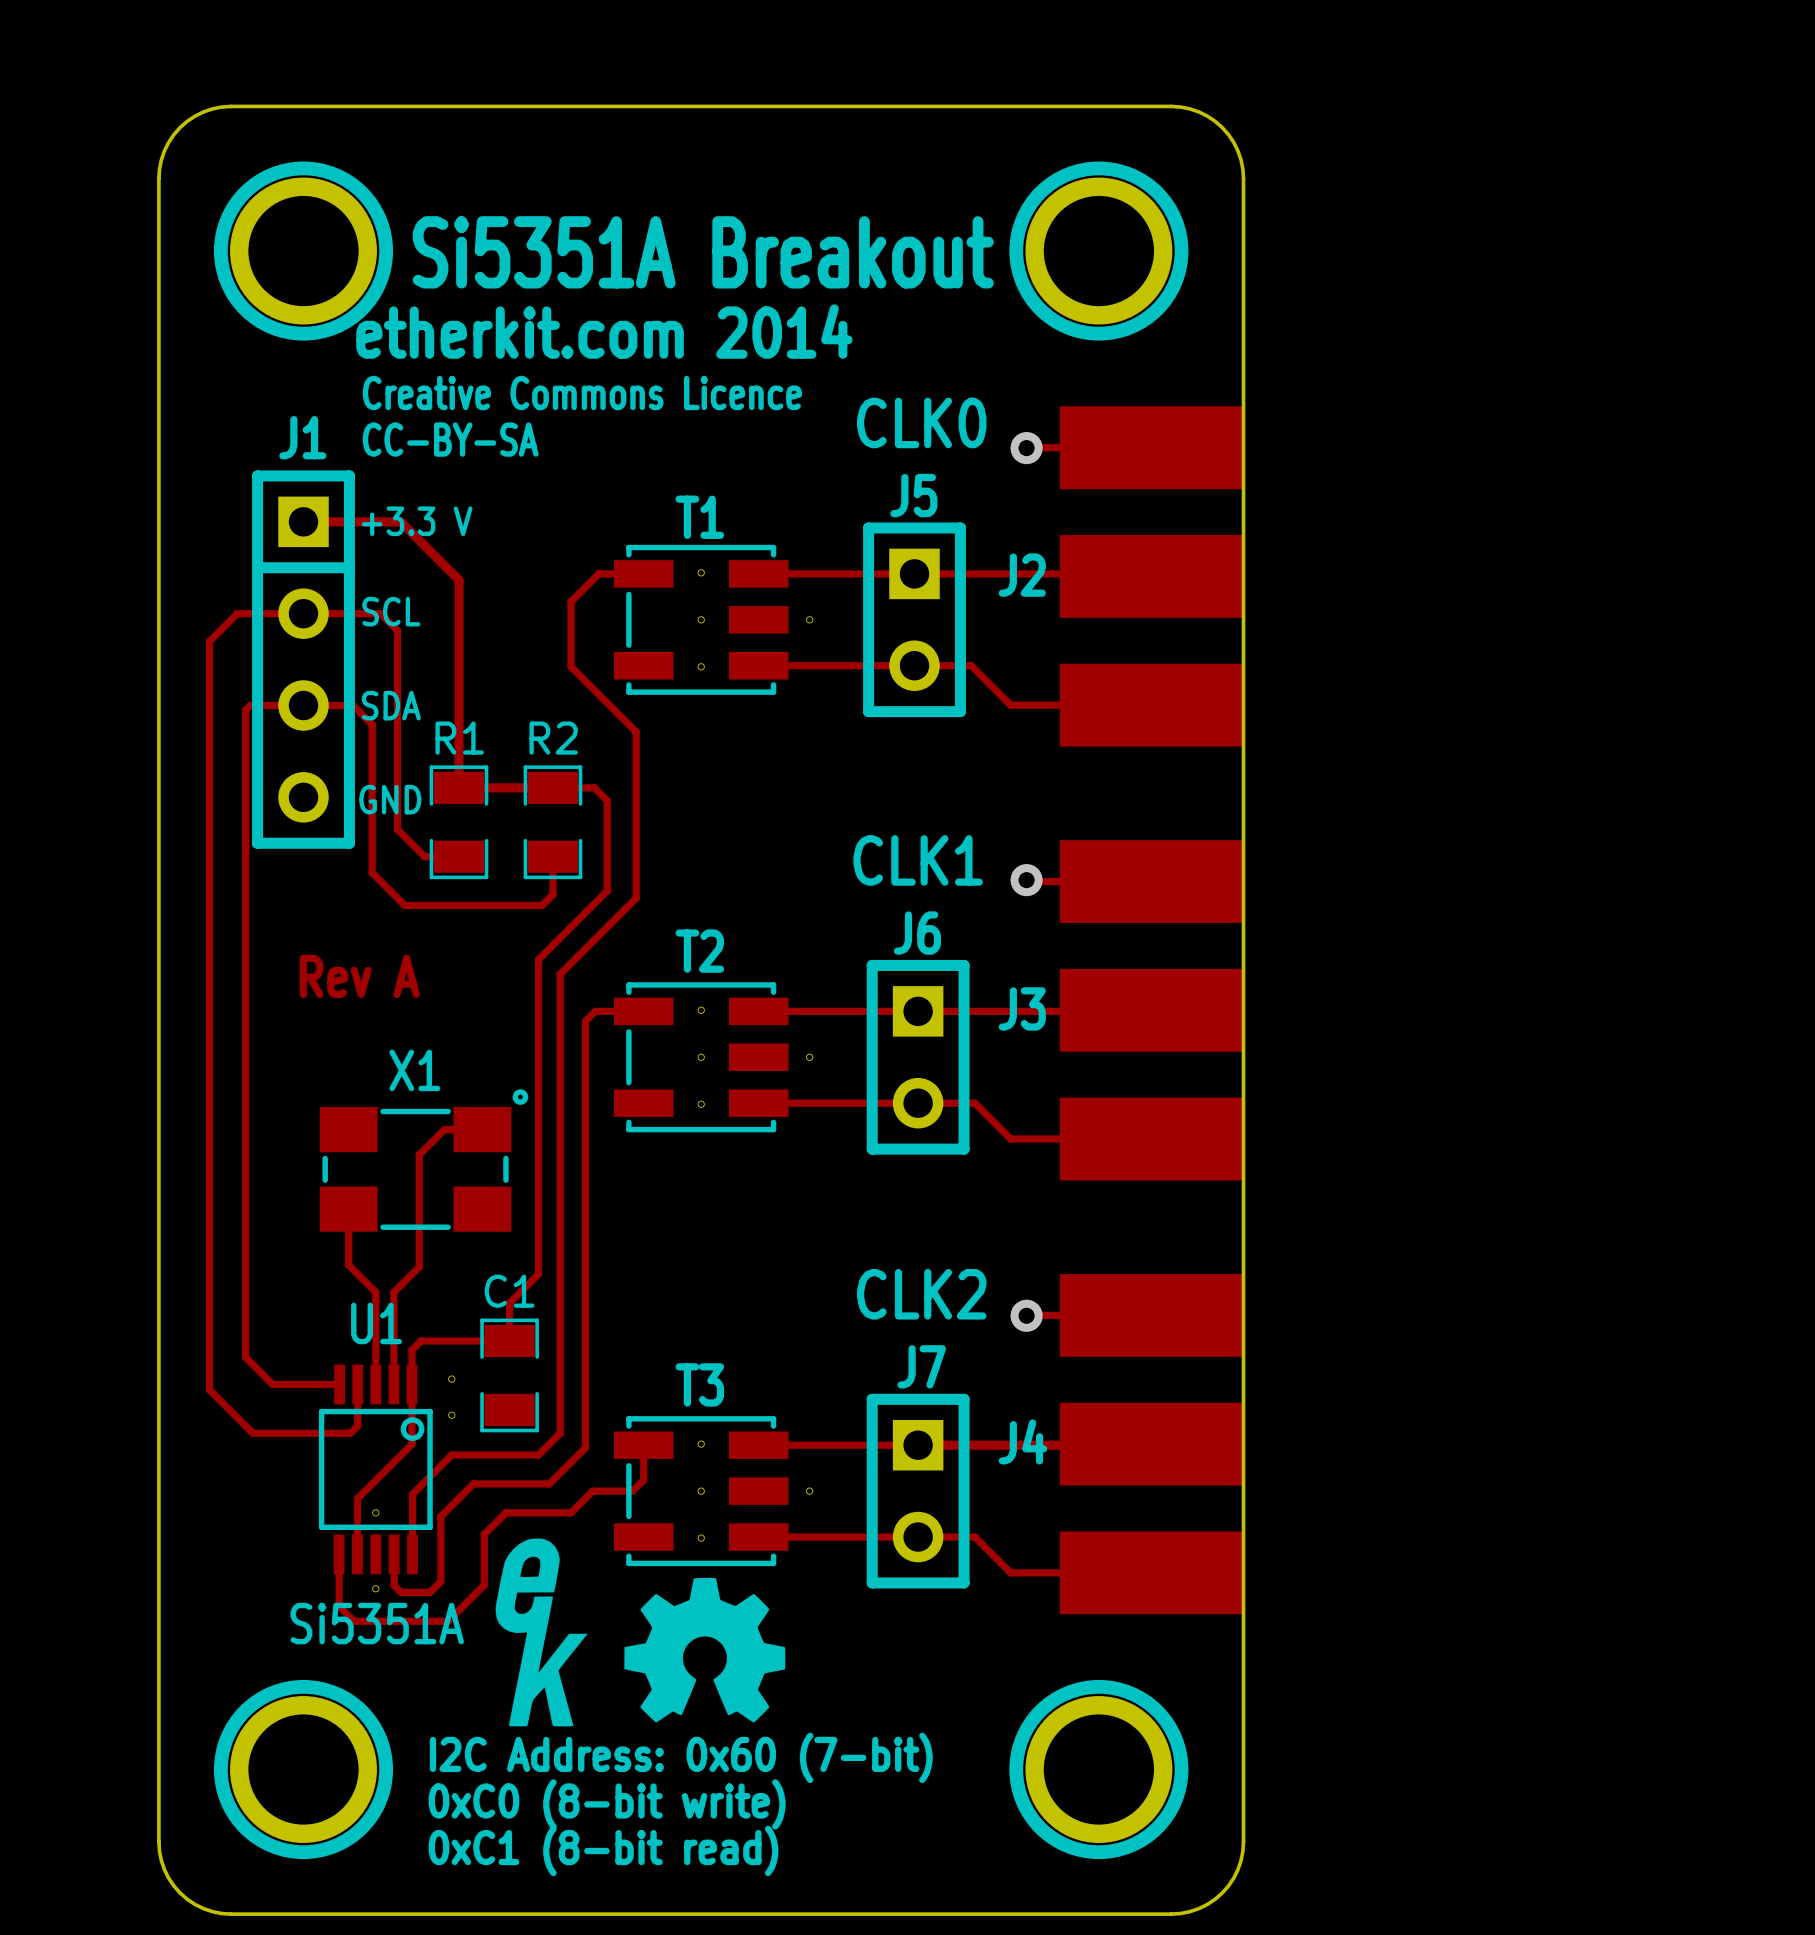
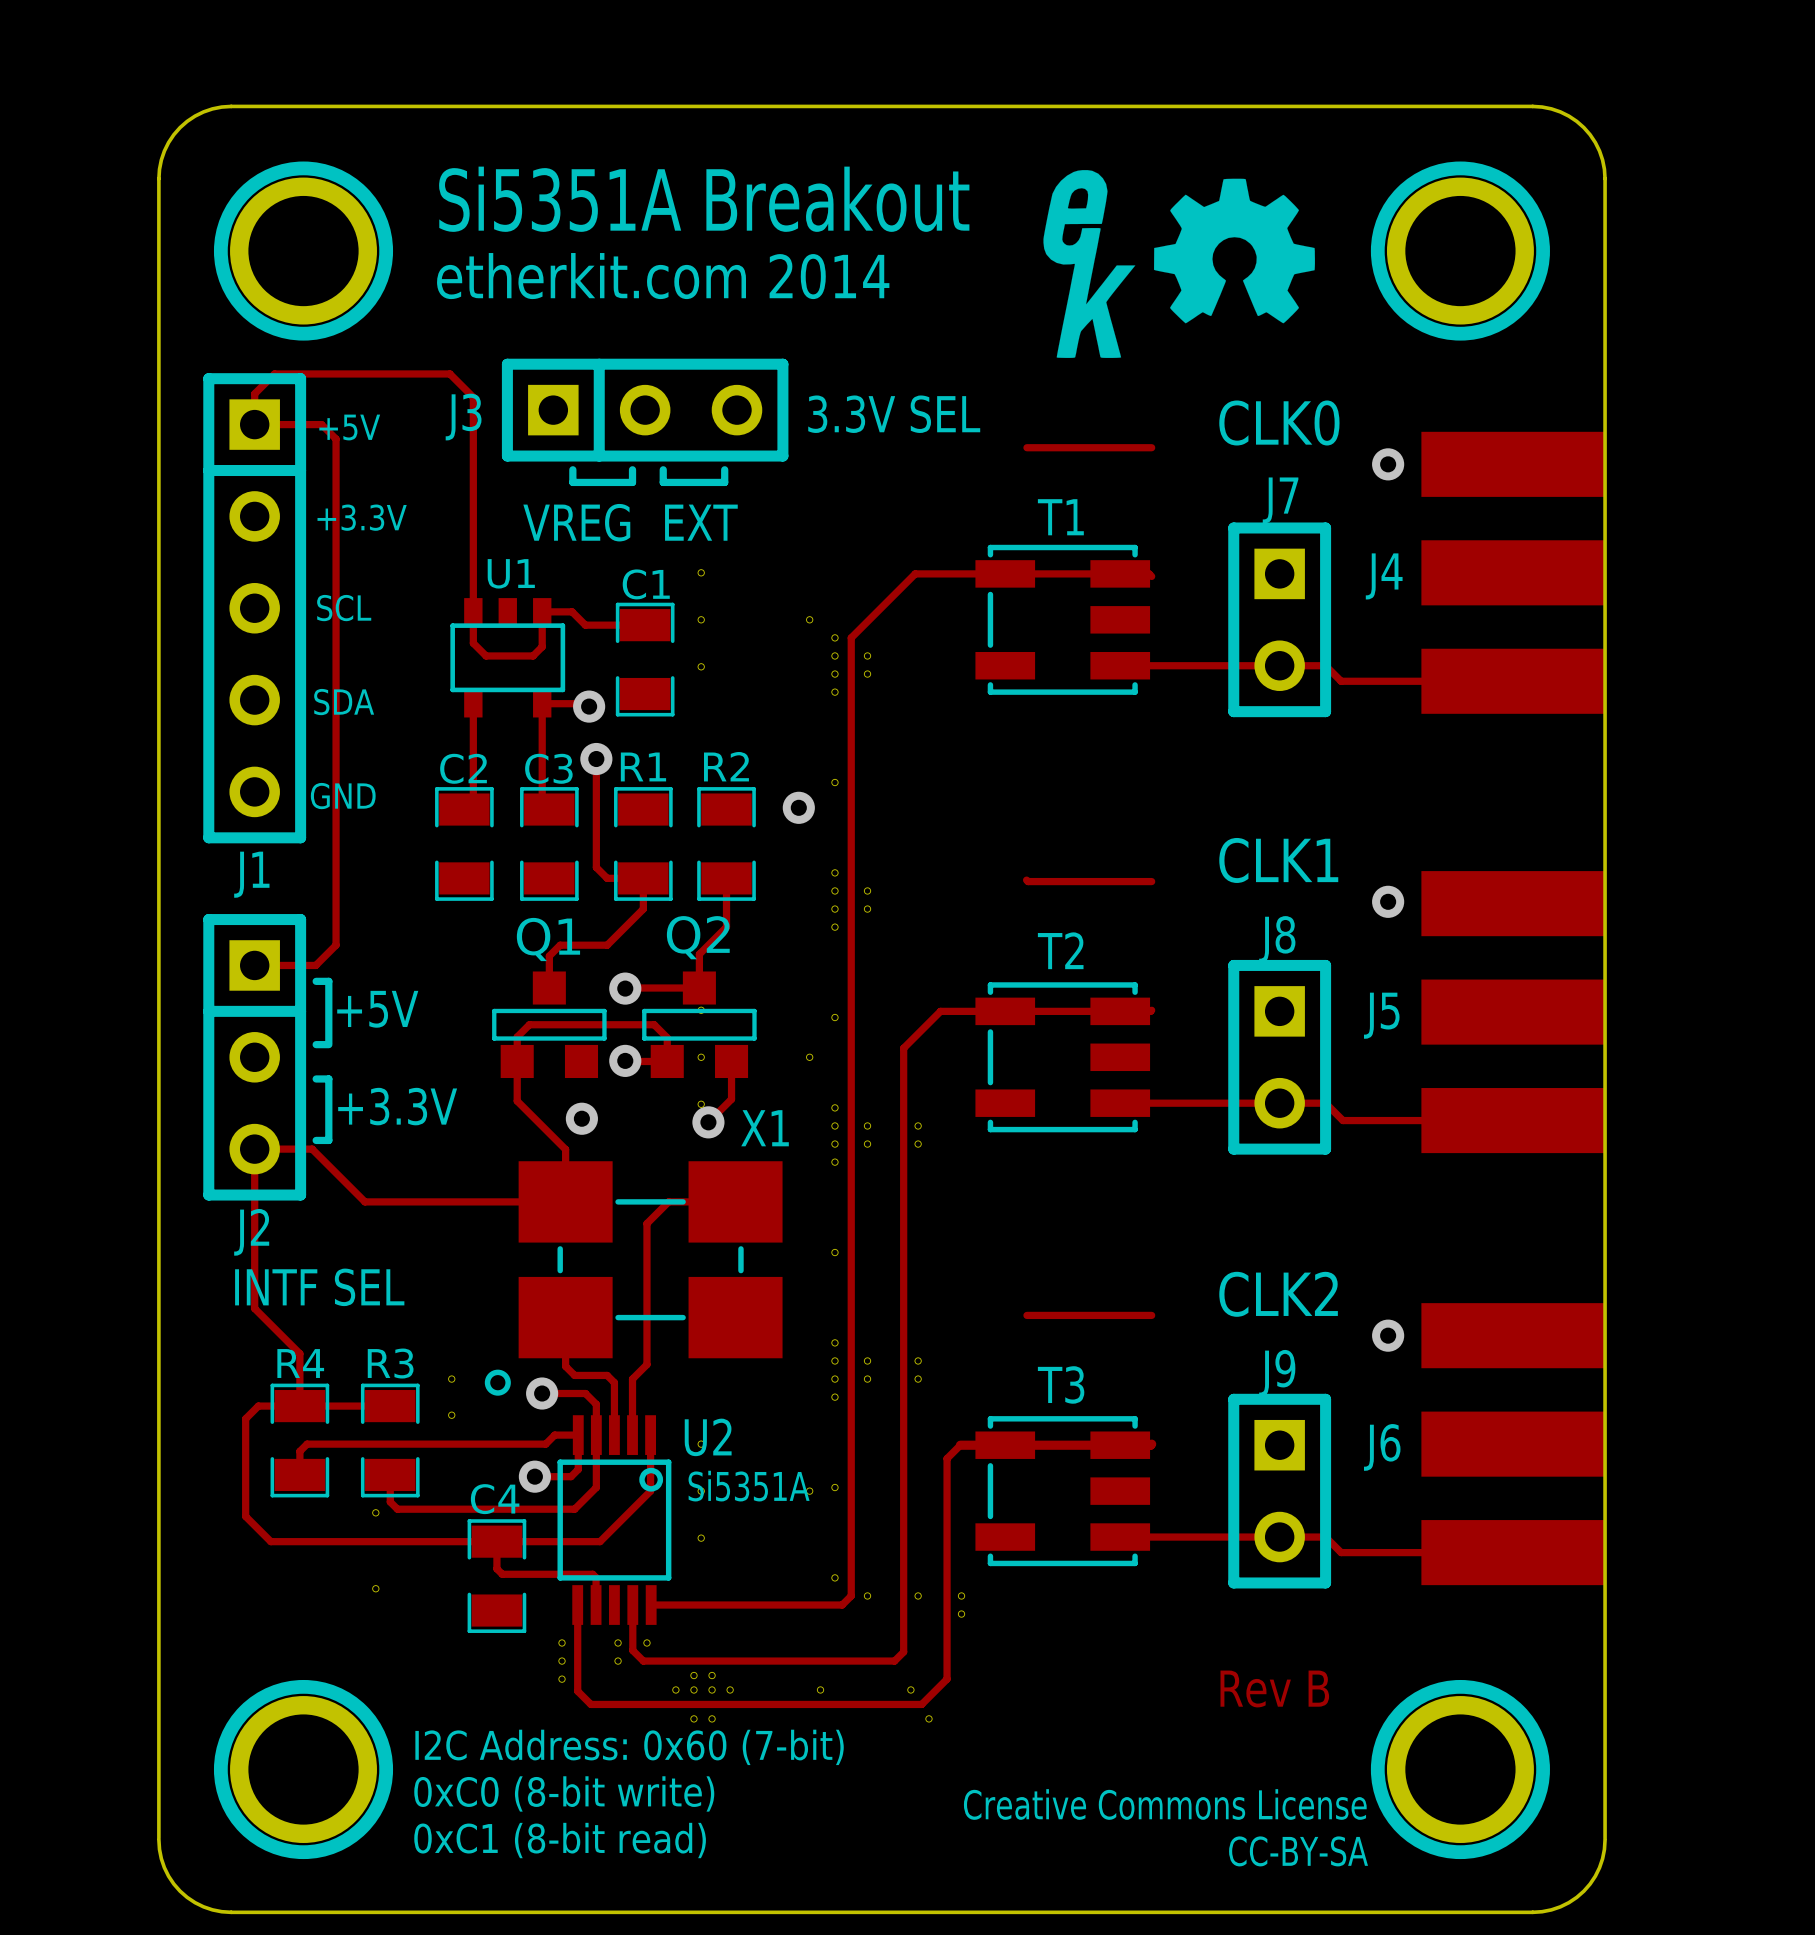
board edge: (1171, 106) (1198, 111) (1222, 127) (1238, 151) (1243, 178) (1243, 1841) (1241, 1860) (1233, 1877) (1222, 1892) (1207, 1904) (1189, 1911) (1171, 1914) (231, 1914) (203, 1908) (180, 1892) (164, 1869) (159, 1851) (158, 1838) -> (1171, 106) (1542, 107) (1560, 111) (1576, 121) (1590, 134) (1602, 160) (1605, 178) (1605, 1838)
drawing: none -> [1043, 170, 1315, 358]
part position: (1098, 251) -> (1460, 251)
text position: Si5351A Breakout (703, 252) -> Si5351A Breakout (704, 199)
text position: etherkit.com 2014 (604, 331) -> etherkit.com 2014 (663, 276)
text: Creative Commons Licence (582, 392) -> none
J2 footprint: [1059, 406, 1244, 747] -> [203, 914, 307, 1201]
text: none -> 3.3V SEL (894, 414)
text position: CLK0 (921, 422) -> CLK0 (1279, 422)
text: none -> +5V (349, 427)
J1 name position: J1 (302, 437) -> J1 (251, 874)
text: CC-BY-SA (450, 439) -> none
via: (1026, 448) -> none
via: none -> (1388, 464)
line: none -> (572, 469) (572, 482) (632, 482) (632, 469)
line: none -> (663, 469) (663, 482) (724, 482) (724, 469)
J1 footprint: [252, 470, 355, 849] -> [203, 373, 307, 844]
J5 name position: J5 (913, 495) -> J5 (1381, 1015)
track: (303, 521) (400, 521) (458, 580) (458, 787) (594, 787) (607, 800) (607, 890) (538, 959) (538, 1274) (509, 1303) (509, 1341) (421, 1341) (411, 1350) (411, 1444) (357, 1498) (357, 1554) -> none
text: +3.3 V (417, 521) -> +3.3V (362, 517)
text: none -> VREG (576, 522)
text: none -> EXT (701, 522)
J5 footprint: [863, 522, 966, 718] -> [1421, 871, 1606, 1154]
track: (643, 573) (598, 573) (571, 601) (571, 666) (636, 731) (636, 898) (560, 974) (560, 1433) (538, 1454) (451, 1454) (412, 1494) (412, 1554) -> none
track: (758, 573) (915, 573) -> (651, 1605) (842, 1605) (851, 1595) (851, 637) (915, 573)
J2 name position: J2 (1022, 575) -> J2 (251, 1232)
text position: SCL (391, 611) -> SCL (344, 608)
T1 position: (701, 619) -> (1062, 619)
track: none -> (645, 625) (585, 625) (572, 611) (542, 611) (542, 646) (533, 655) (486, 655) (473, 643) (473, 397) (449, 373) (274, 373) (254, 393) (254, 424) (321, 424) (336, 439) (336, 945) (315, 965) (254, 965)
part: none -> (834, 637)
part: none -> (834, 655)
part: none -> (867, 655)
track: (758, 665) (971, 665) (1010, 705) (1151, 705) -> none
track: none -> (1120, 665) (1325, 665) (1341, 681) (1513, 681)
part: none -> (834, 674)
part: none -> (867, 674)
part: none -> (834, 692)
track: none -> (473, 703) (473, 800) (464, 809)
text position: SDA (391, 705) -> SDA (344, 702)
track: none -> (589, 706) (586, 703) (542, 703) (542, 802) (549, 809)
via: none -> (589, 706)
R1 name position: R1 (459, 738) -> R1 (643, 766)
R2 name position: R2 (553, 738) -> R2 (726, 766)
track: none -> (596, 759) (596, 867) (607, 878) (643, 878)
via: none -> (596, 759)
part: none -> (834, 782)
text position: GND (390, 799) -> GND (343, 796)
via: none -> (798, 807)
R1 position: (458, 822) -> (643, 843)
R2 position: (552, 822) -> (726, 843)
J3 footprint: [1059, 840, 1244, 1181] -> [501, 358, 789, 462]
C2: none -> (464, 843)
C3: none -> (549, 843)
track: (458, 856) (424, 856) (397, 829) (397, 630) (380, 613) (237, 613) (209, 641) (209, 1389) (252, 1433) (350, 1433) (357, 1426) (357, 1384) -> none
track: (552, 856) (552, 894) (542, 905) (404, 905) (372, 872) (372, 724) (353, 705) (250, 705) (245, 710) (245, 1357) (272, 1384) (339, 1384) -> none
text position: CLK1 (918, 860) -> CLK1 (1278, 860)
part: none -> (834, 872)
track: none -> (643, 878) (643, 909) (607, 945) (560, 945) (549, 956) (549, 988)
track: none -> (726, 878) (726, 927) (699, 954) (699, 988) (625, 988)
via: (1026, 880) -> none
part: none -> (834, 890)
part: none -> (867, 890)
via: none -> (1388, 901)
part: none -> (834, 909)
part: none -> (867, 909)
part: none -> (834, 927)
J6 name position: J6 (917, 933) -> J6 (1382, 1447)
J6 footprint: [866, 959, 970, 1155] -> [1421, 1303, 1606, 1586]
text: Rev A (359, 976) -> none
line: none -> (316, 981) (328, 981) (328, 1042)
via: none -> (625, 988)
text: none -> +5V (377, 1009)
track: (643, 1011) (595, 1011) (585, 1021) (585, 1447) (549, 1483) (473, 1483) (440, 1516) (440, 1581) (430, 1592) (401, 1592) (394, 1585) (394, 1554) -> none
track: (758, 1011) (940, 1011) -> (632, 1605) (632, 1650) (643, 1661) (894, 1661) (903, 1652) (903, 1048) (940, 1011)
part: none -> (834, 1017)
Q1: none -> (549, 1024)
Q2: none -> (699, 1024)
line: none -> (316, 1044) (328, 1044)
T2 position: (701, 1057) -> (1062, 1057)
J8: none -> (1279, 1057)
track: none -> (625, 1060) (667, 1061) (667, 1037) (654, 1024) (529, 1024) (517, 1037) (517, 1101) (565, 1149) (565, 1201) (364, 1201) (312, 1149) (254, 1149) (254, 1308) (299, 1353) (299, 1406)
via: none -> (625, 1060)
track: none -> (731, 1061) (731, 1099) (708, 1122)
X1 name position: X1 (414, 1070) -> X1 (765, 1128)
line: none -> (316, 1078) (328, 1078) (328, 1140) (316, 1140)
X1 footprint: [319, 1089, 529, 1232] -> [484, 1161, 783, 1396]
track: (758, 1103) (974, 1103) (1010, 1138) (1151, 1138) -> none
track: none -> (1120, 1103) (1325, 1103) (1342, 1120) (1513, 1120)
text: none -> +3.3V (397, 1106)
part: none -> (834, 1107)
via: none -> (581, 1118)
via: none -> (708, 1122)
part: none -> (834, 1125)
part: none -> (867, 1125)
part: none -> (918, 1125)
track: (482, 1129) (444, 1129) (419, 1154) (419, 1266) (393, 1292) (393, 1384) -> none
part: none -> (834, 1144)
part: none -> (867, 1144)
part: none -> (918, 1144)
part: none -> (834, 1162)
track: none -> (735, 1201) (668, 1201) (646, 1223) (646, 1364) (632, 1379) (632, 1435)
track: (348, 1209) (348, 1265) (375, 1292) (375, 1384) -> none
part: none -> (834, 1252)
J4 footprint: [1059, 1274, 1244, 1615] -> [1421, 431, 1606, 714]
text: none -> INTF SEL (319, 1287)
C1 name position: C1 (509, 1291) -> C1 (646, 584)
text position: CLK2 (921, 1294) -> CLK2 (1278, 1294)
via: (1026, 1315) -> none
track: none -> (565, 1317) (565, 1366) (574, 1375) (607, 1375) (614, 1382) (614, 1435)
via: none -> (1388, 1335)
part: none -> (834, 1342)
part: none -> (834, 1360)
part: none -> (867, 1360)
part: none -> (918, 1360)
U1 footprint: [318, 1364, 433, 1575] -> [450, 598, 566, 718]
C1 position: (509, 1375) -> (645, 659)
part: none -> (834, 1379)
part: none -> (867, 1379)
part: none -> (918, 1379)
via: none -> (542, 1393)
part: none -> (834, 1397)
track: none -> (390, 1406) (258, 1406) (245, 1418) (245, 1516) (270, 1541) (600, 1541) (650, 1491) (650, 1435)
R4: none -> (299, 1440)
R3: none -> (390, 1440)
track: (643, 1445) (643, 1479) (632, 1491) (592, 1491) -> (542, 1393) (585, 1393) (596, 1404) (596, 1487) (592, 1491)
track: (758, 1445) (960, 1445) -> (577, 1605) (577, 1691) (590, 1704) (921, 1704) (947, 1679) (947, 1458) (960, 1445)
track: none -> (299, 1474) (299, 1451) (307, 1444) (545, 1444) (554, 1435) (578, 1435) (578, 1469) (571, 1476) (534, 1476)
via: none -> (534, 1476)
part: none -> (834, 1487)
T3 position: (701, 1491) -> (1062, 1491)
J7 position: (918, 1491) -> (1279, 619)
J9: none -> (1279, 1491)
track: (574, 1509) (571, 1512) (505, 1512) (484, 1534) (484, 1585) (448, 1621) (354, 1621) (339, 1606) (339, 1554) -> (574, 1509) (397, 1509) (390, 1501) (390, 1474)
U2: none -> Si5351A (614, 1520)
track: (758, 1537) (974, 1537) (1010, 1572) (1151, 1572) -> none
track: none -> (1120, 1537) (1325, 1537) (1341, 1552) (1513, 1552)
drawing: [495, 1538, 786, 1727] -> none
track: none -> (496, 1541) (496, 1568) (502, 1574) (592, 1574) (596, 1577) (596, 1605)
C4: none -> (496, 1576)
part: none -> (834, 1577)
part: none -> (867, 1595)
part: none -> (918, 1595)
part: none -> (961, 1595)
part: none -> (961, 1614)
U1 value: Si5351A (377, 1623) -> none
part: none -> (562, 1642)
part: none -> (618, 1642)
part: none -> (646, 1642)
part: none -> (562, 1661)
part: none -> (618, 1661)
part: none -> (693, 1675)
part: none -> (712, 1675)
part: none -> (562, 1679)
text: none -> Rev B (1274, 1688)
part: none -> (675, 1689)
part: none -> (693, 1689)
part: none -> (712, 1689)
part: none -> (730, 1689)
part: none -> (820, 1689)
part: none -> (910, 1689)
part: none -> (693, 1718)
part: none -> (712, 1718)
part: none -> (928, 1718)
text position: I2C Address: 0x60 (7-bit) (681, 1757) -> I2C Address: 0x60 (7-bit) (629, 1747)
part position: (1098, 1769) -> (1460, 1769)
text position: 0xC0 (8-bit write) (607, 1804) -> 0xC0 (8-bit write) (564, 1793)
text: none -> Creative Commons License (1165, 1804)
board edge: none -> (158, 1840) (164, 1867) (180, 1891) (203, 1906) (231, 1912) (1532, 1912) (1560, 1906) (1583, 1891) (1599, 1867) (1605, 1840)
text position: 0xC1 (8-bit read) (603, 1850) -> 0xC1 (8-bit read) (560, 1840)
text: none -> CC-BY-SA (1298, 1851)

